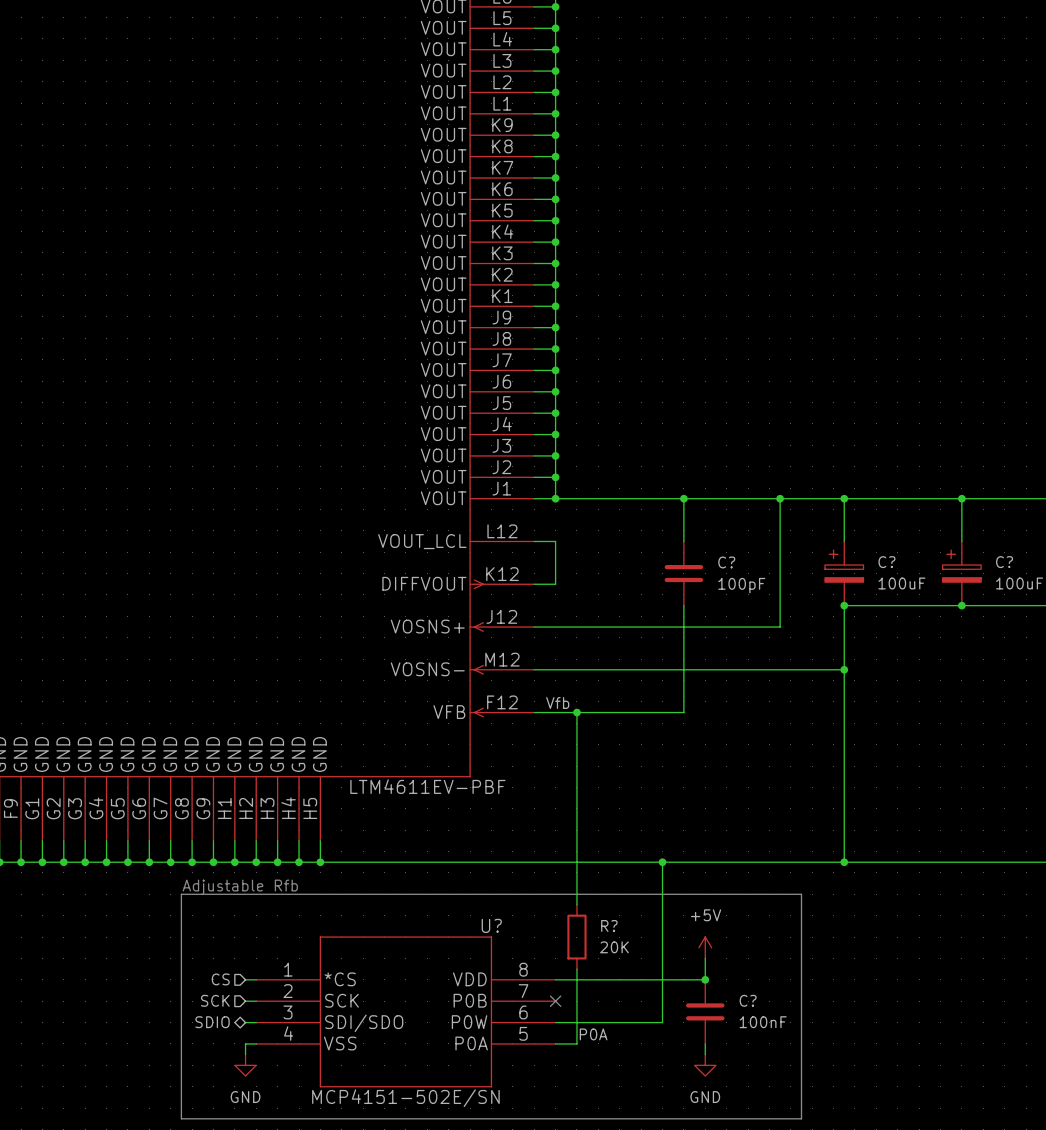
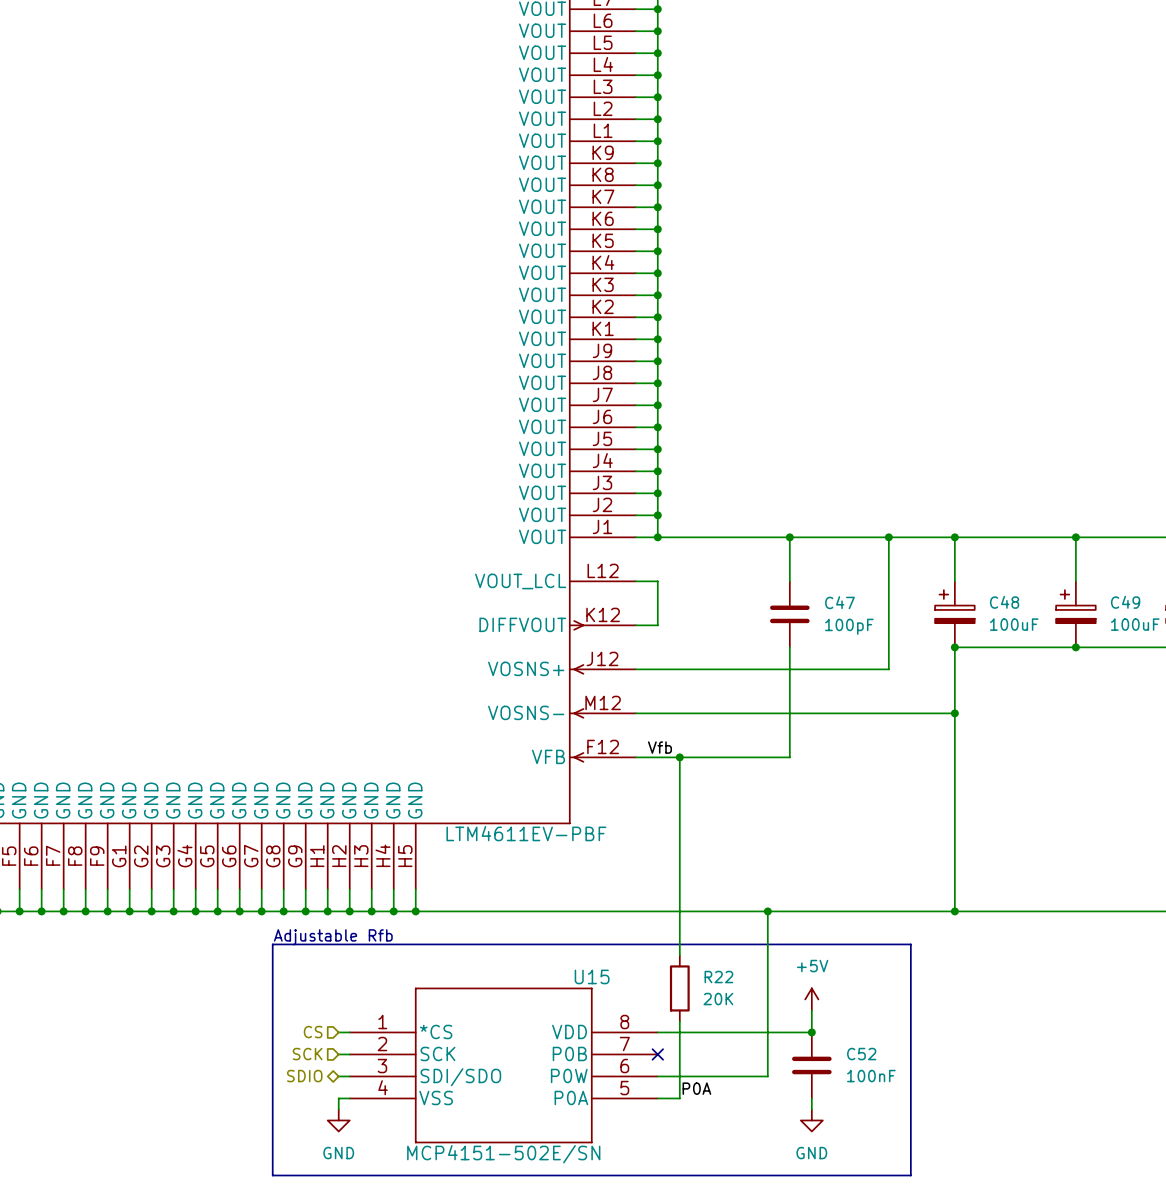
C? name: C? (726, 562) -> C47 (839, 602)
C? name: C? (886, 562) -> C48 (1004, 602)
C? name: C? (1004, 562) -> C49 (1125, 602)
U? name: U? (491, 925) -> U15 (592, 976)
R? name: R? (609, 925) -> R22 (718, 977)
C? name: C? (748, 1000) -> C52 (861, 1054)

